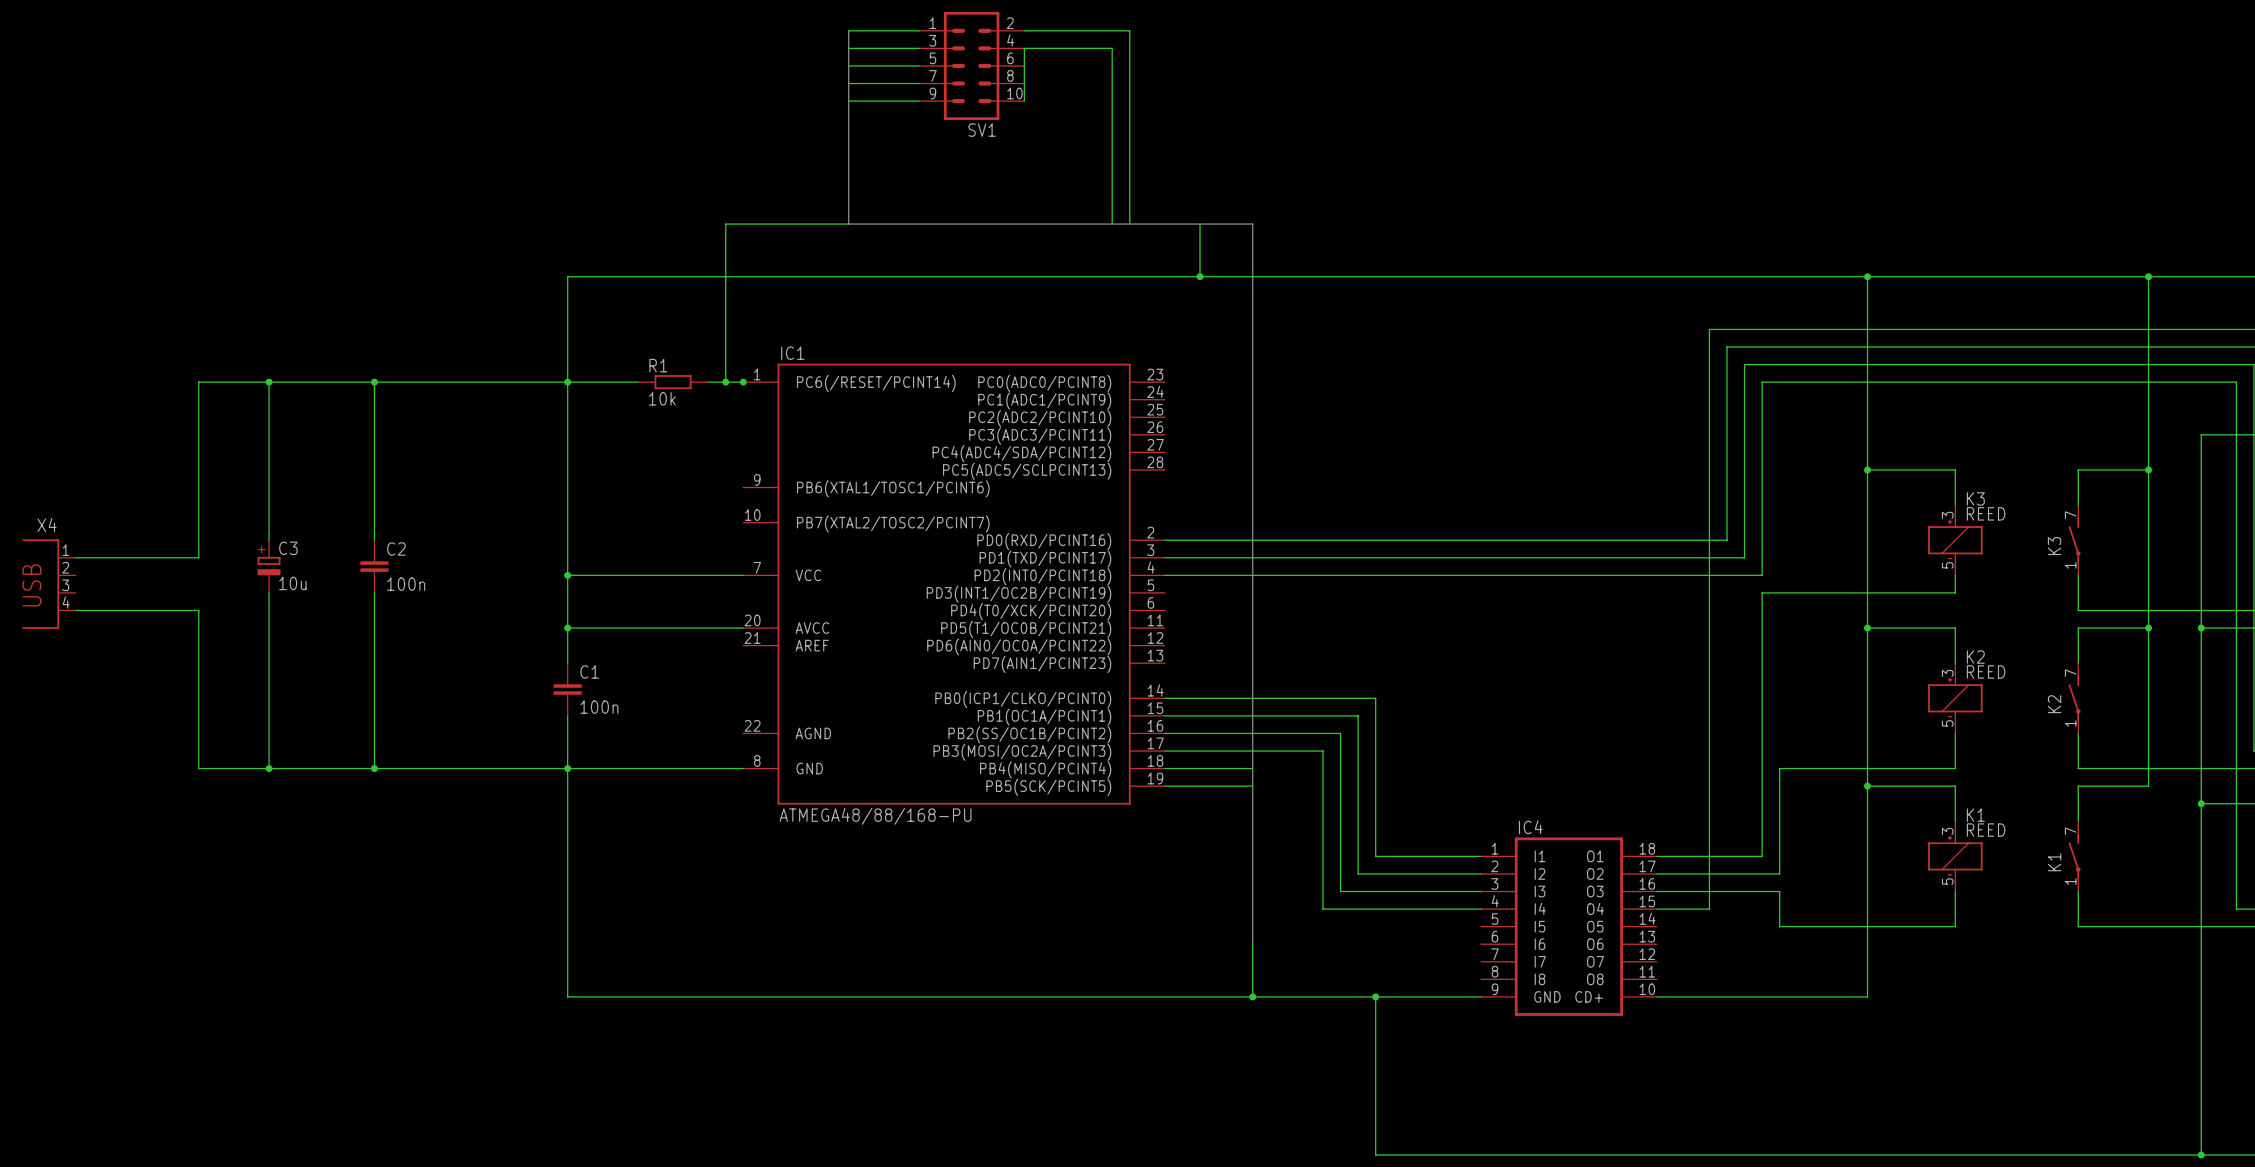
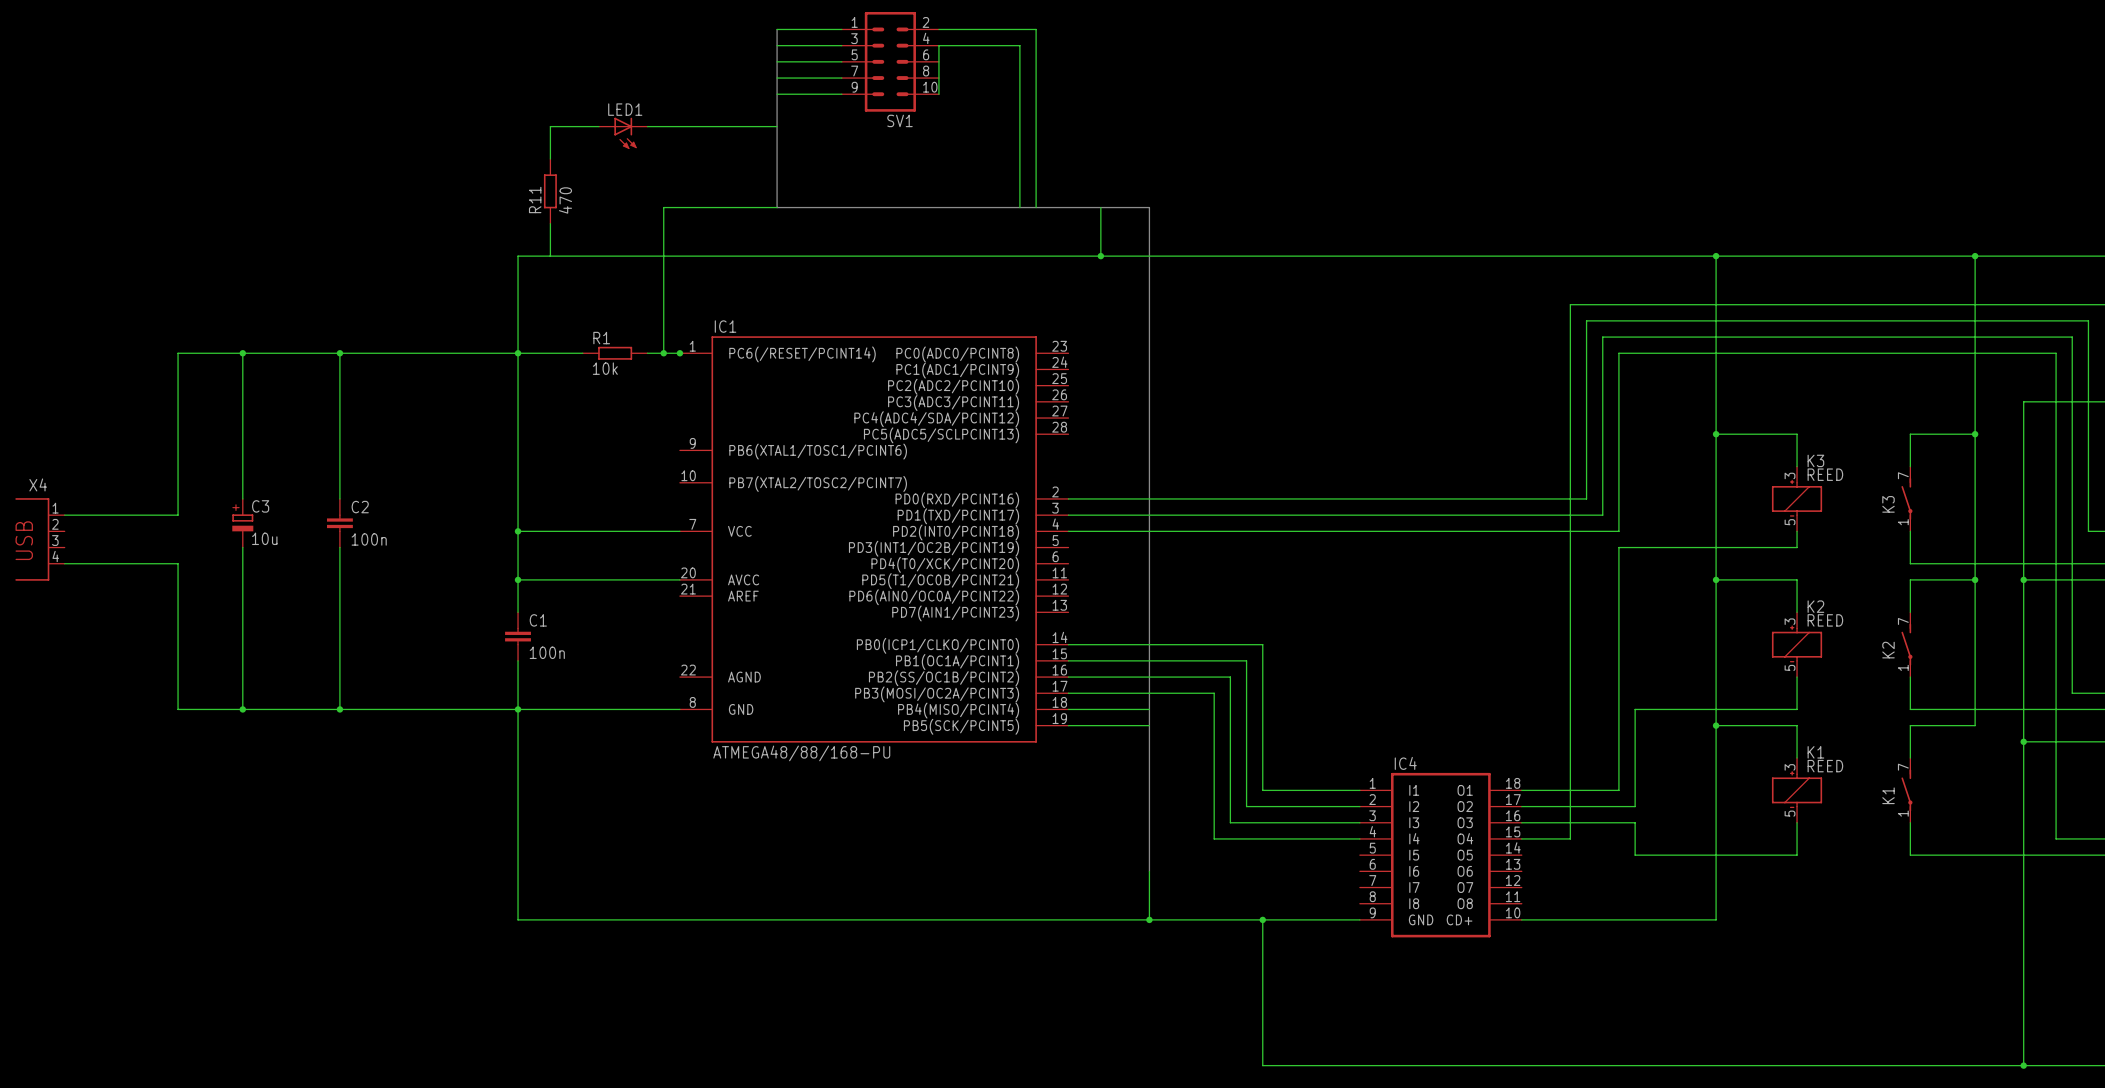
wire: none -> (598, 126) (550, 126) (550, 158)
wire: none -> (647, 126) (777, 126)
LED1: none -> (623, 133)
R11: none -> 470 (550, 191)
wire: none -> (550, 223) (550, 256)

